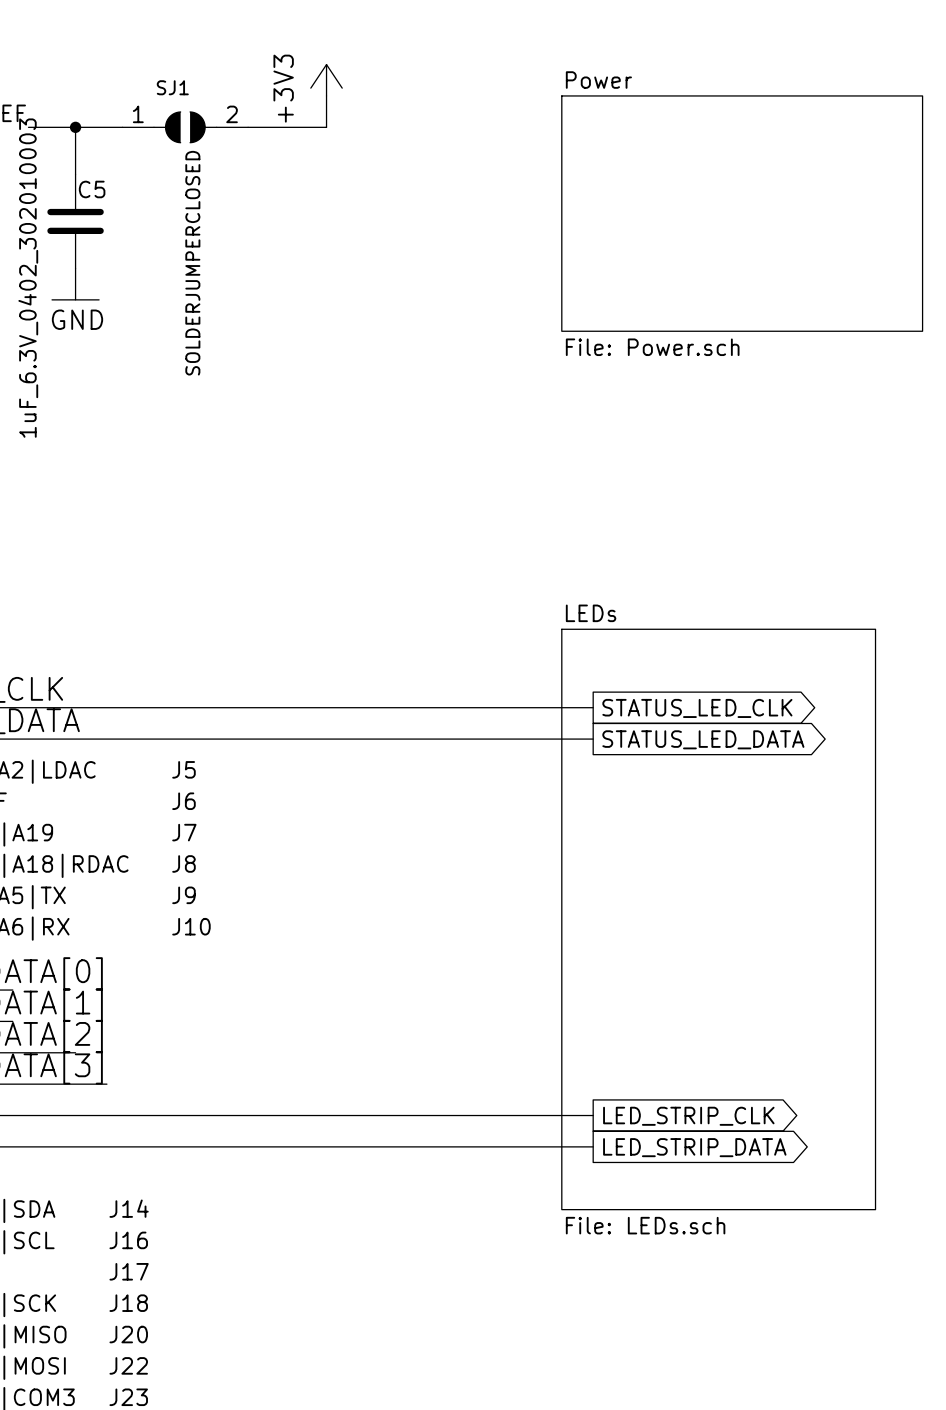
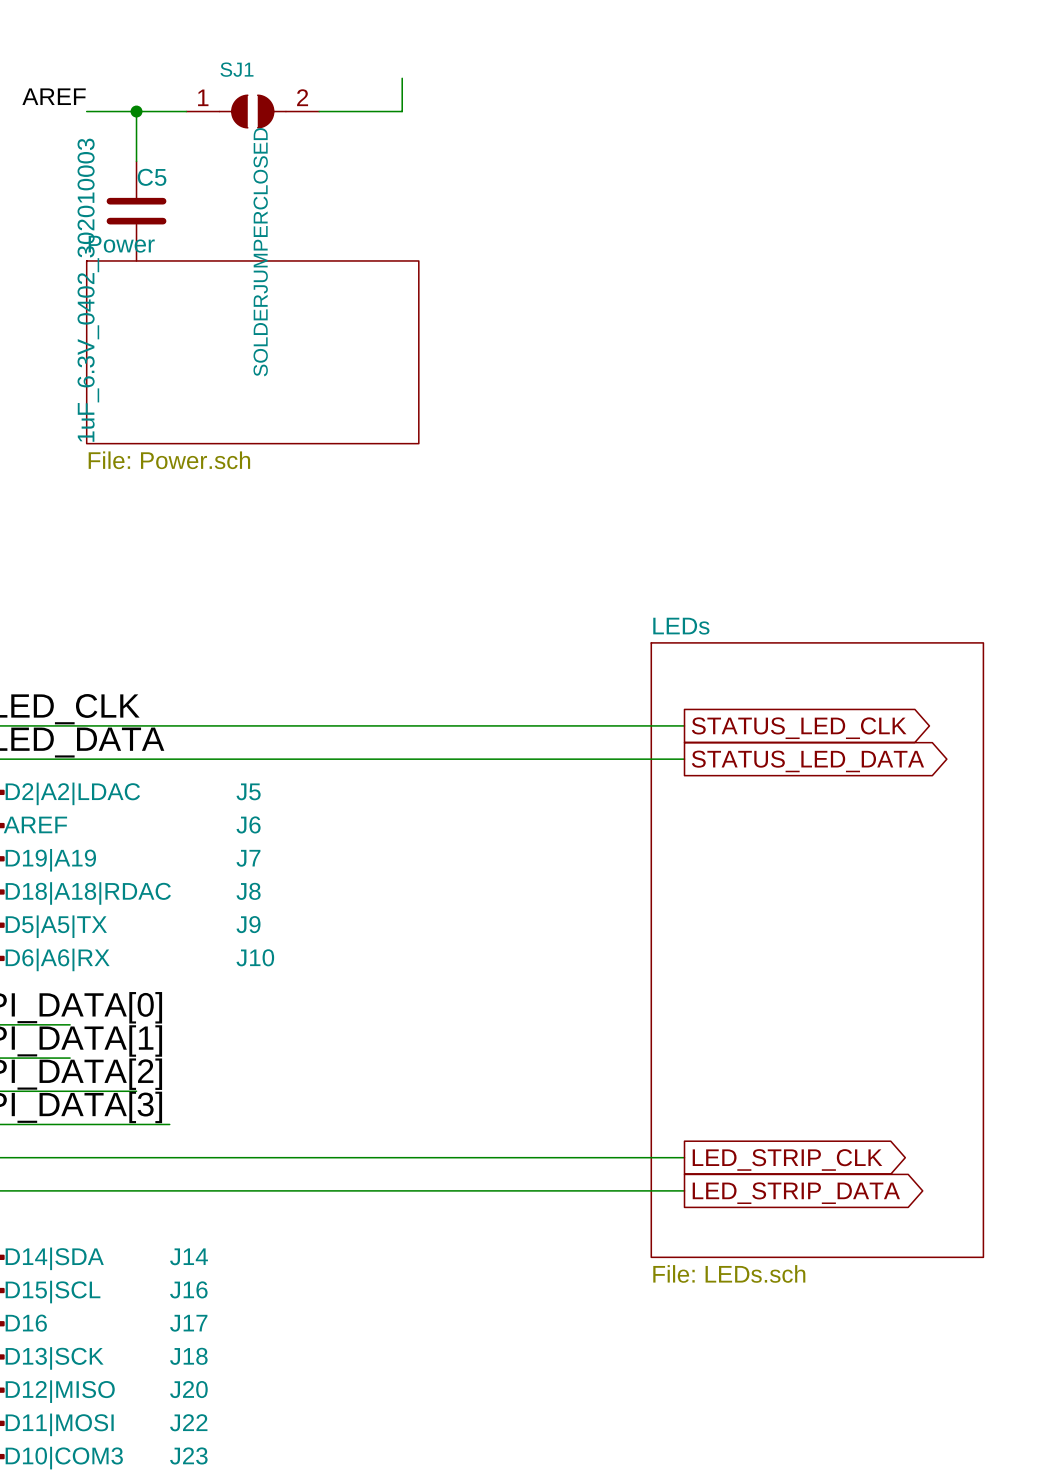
power symbol: +3V3 (326, 80) -> none
sheet Power: File: Power.sch (742, 213) -> none
power symbol: GND (75, 284) -> none
sheet Power: none -> File: Power.sch (252, 352)

